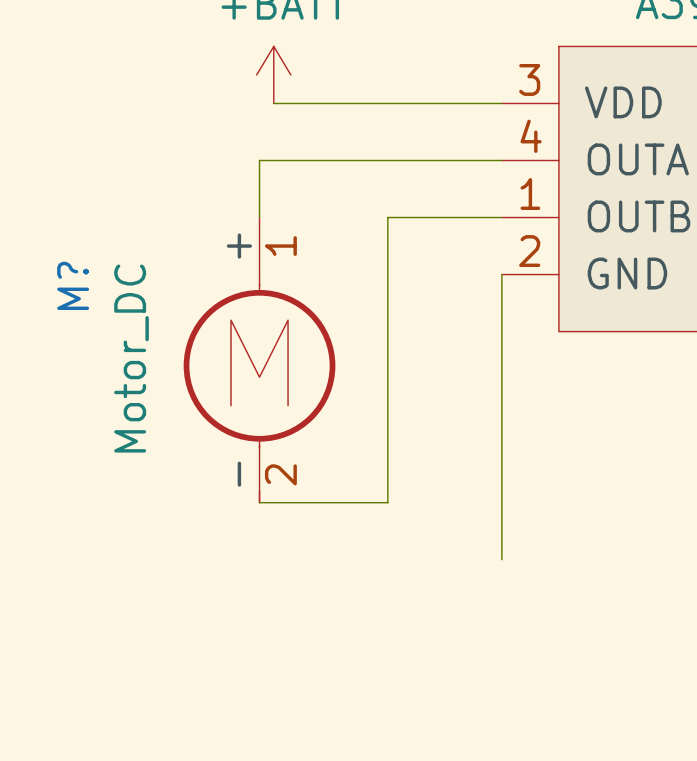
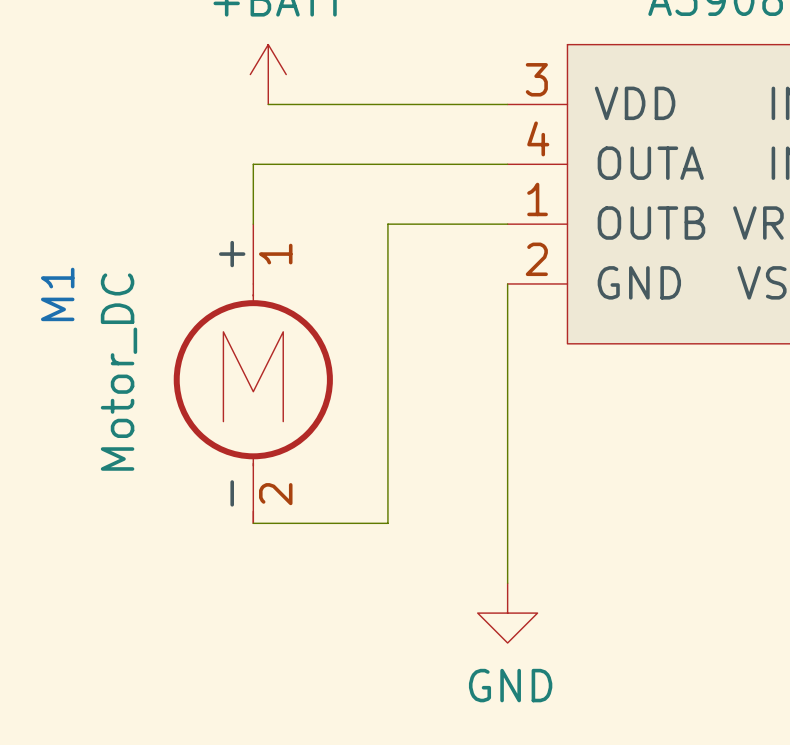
M? name: M? (73, 285) -> M1 (57, 294)
power symbol: none -> GND (507, 613)

